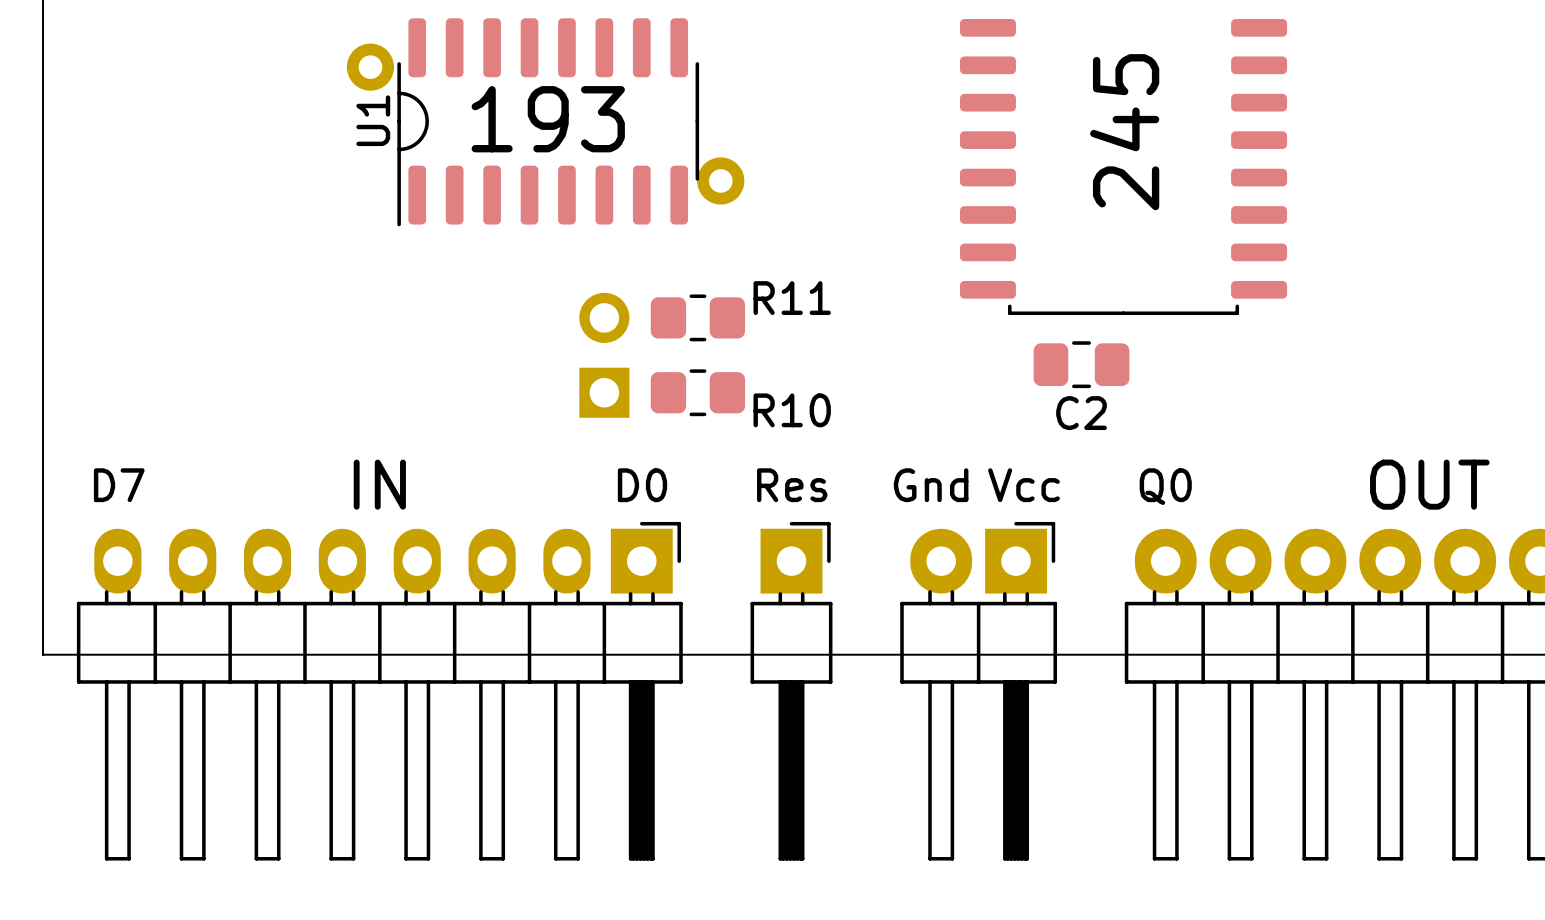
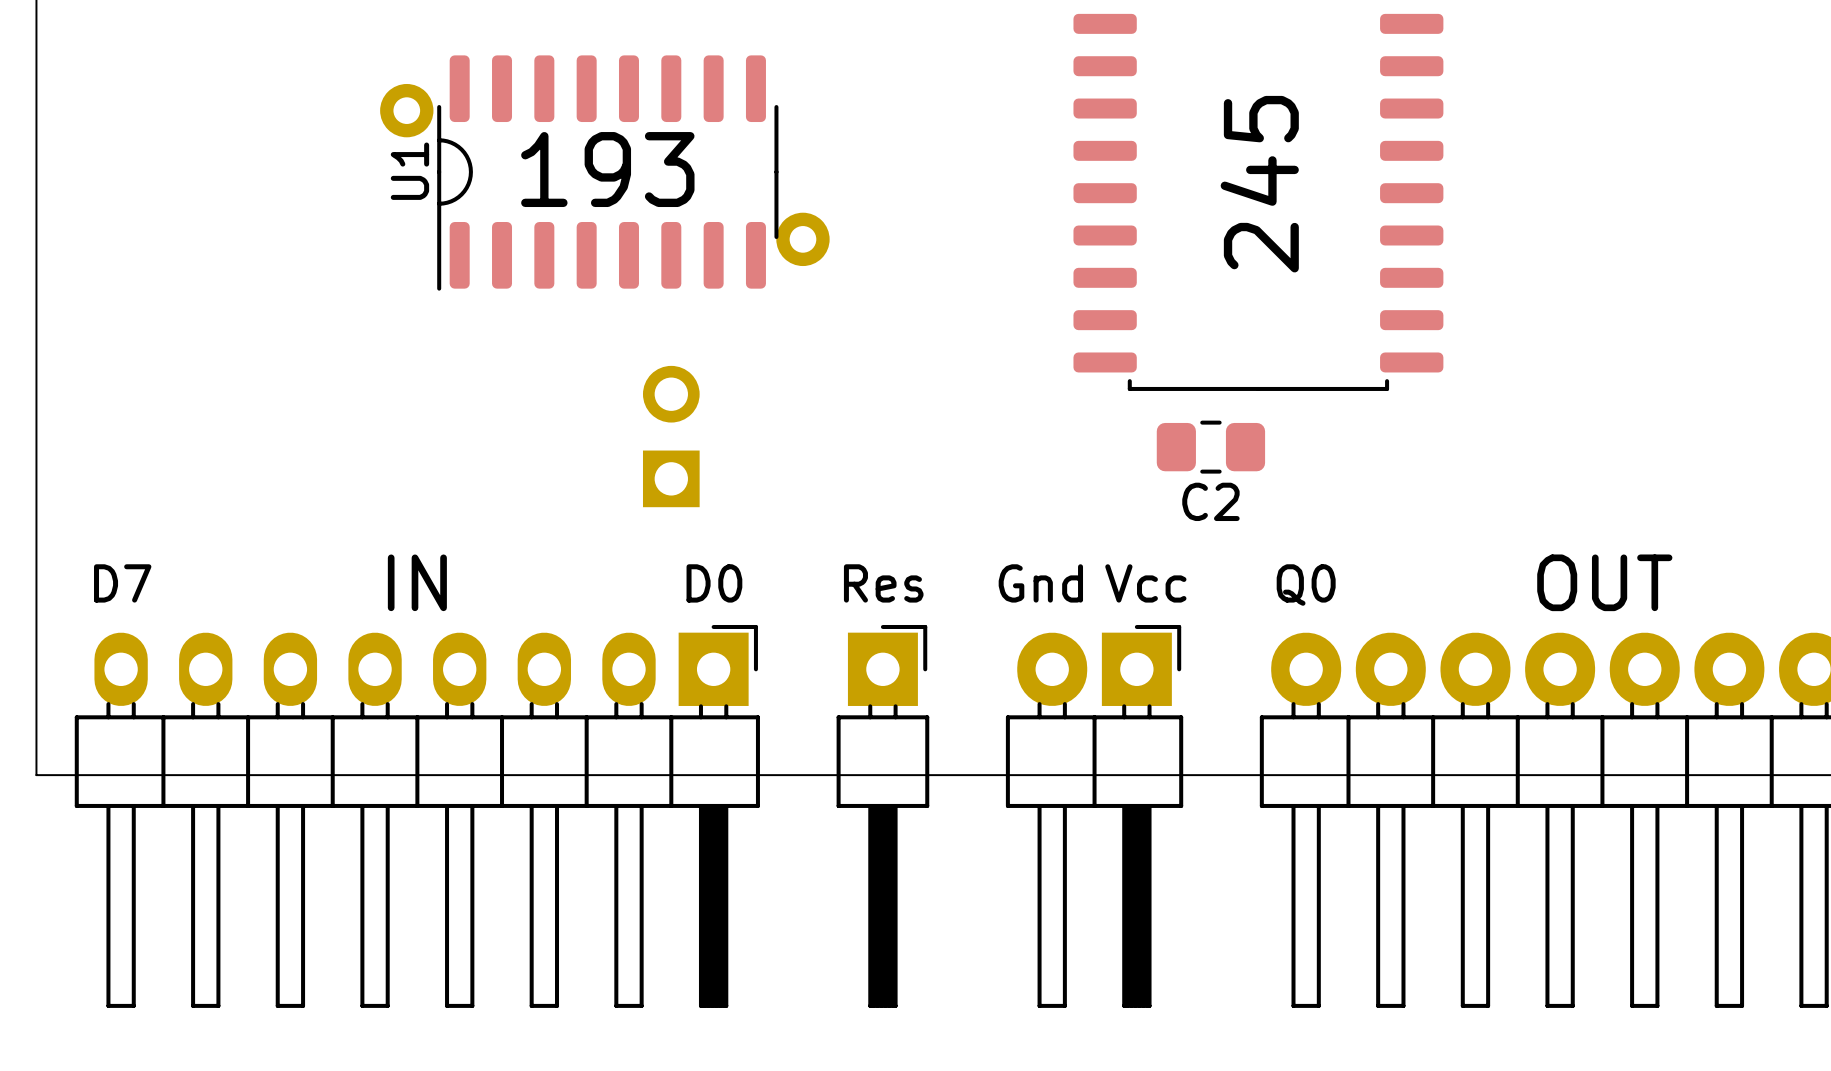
R11: (697, 317) -> none
R10: (697, 392) -> none

